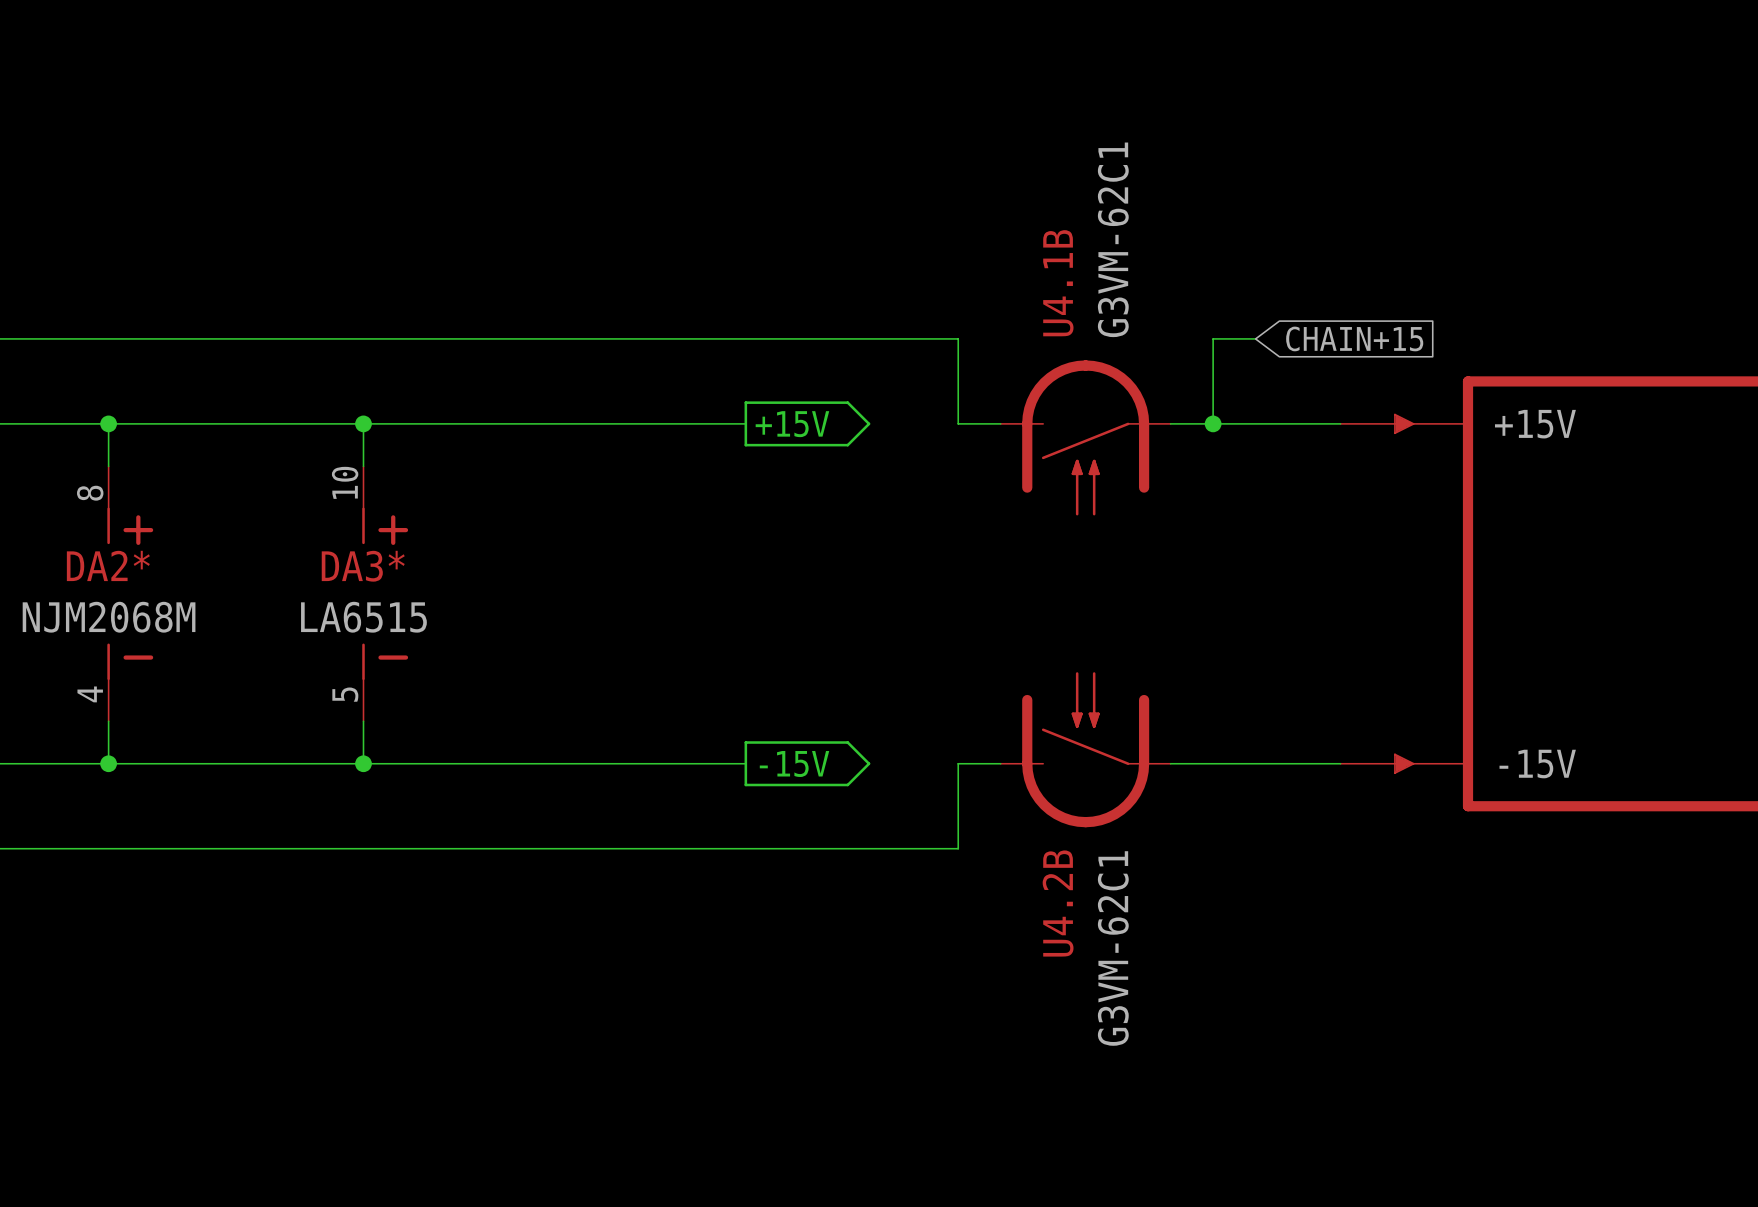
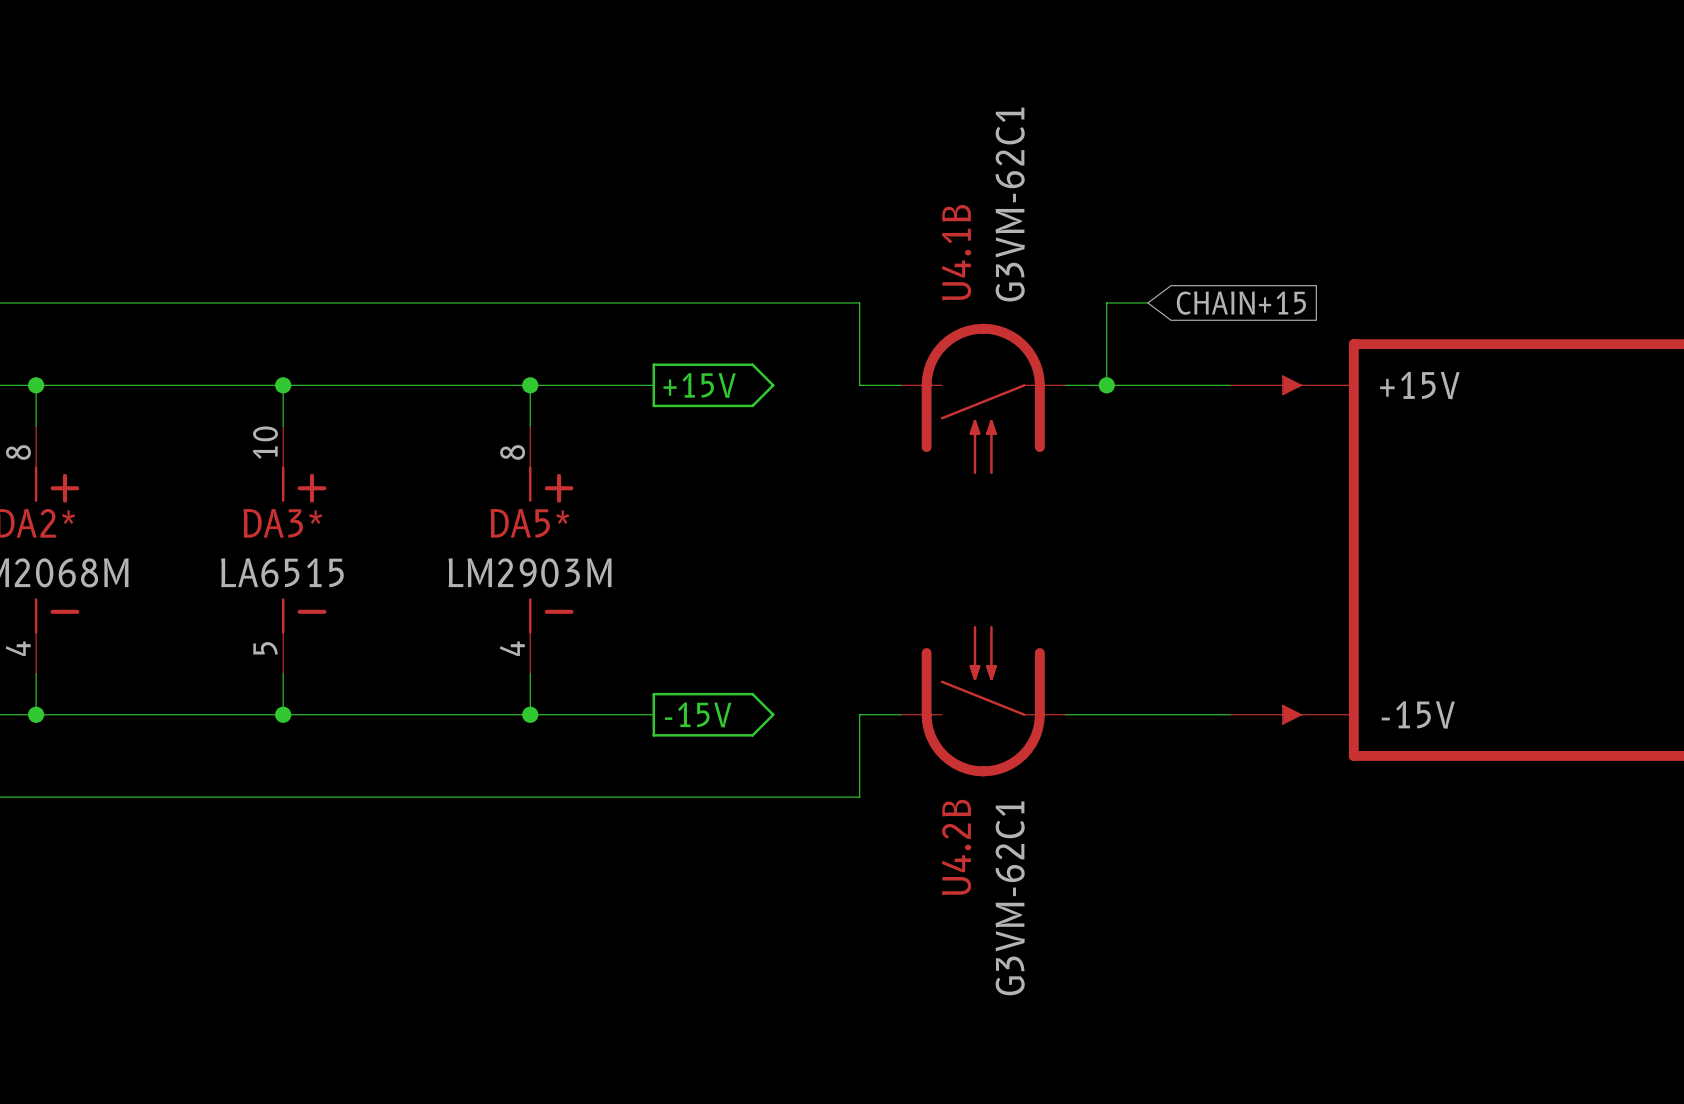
wire: none -> (530, 385) (530, 426)
junction: none -> (530, 385)
DA5*: none -> LM2903M (551, 550)
wire: none -> (530, 673) (530, 714)
junction: none -> (530, 714)

